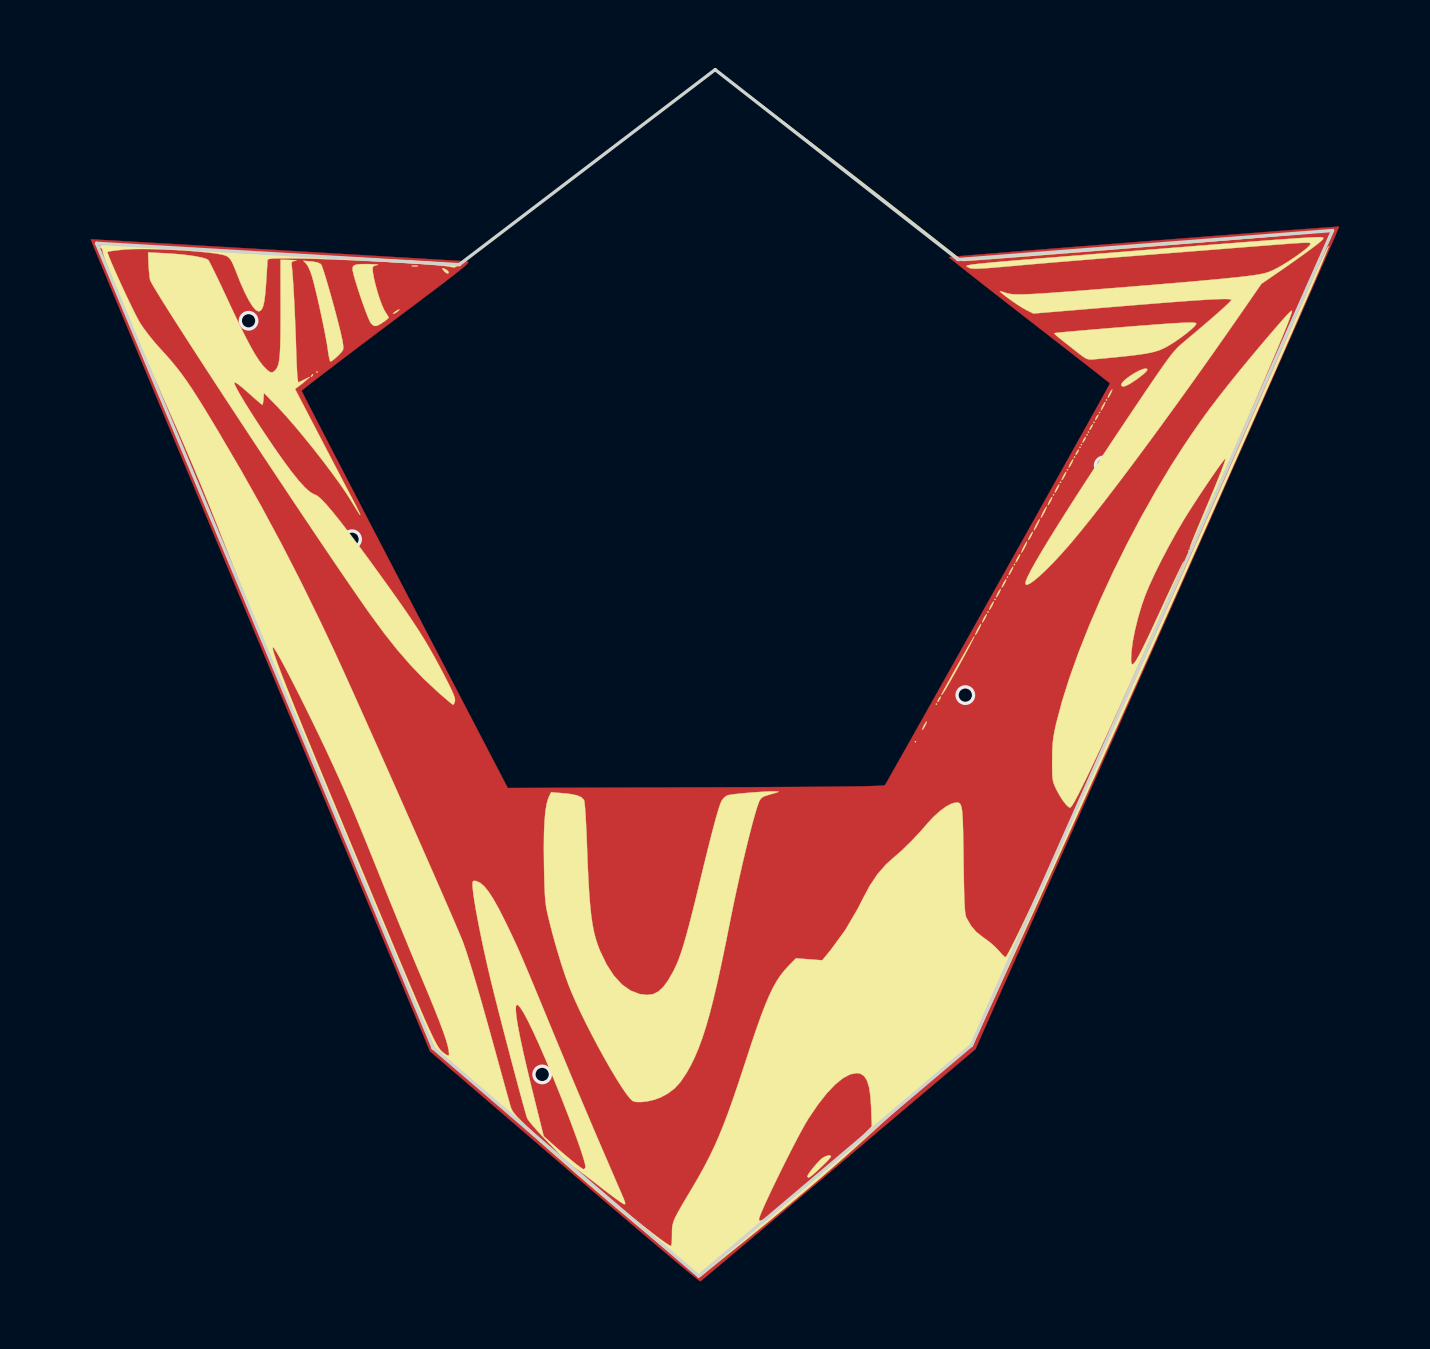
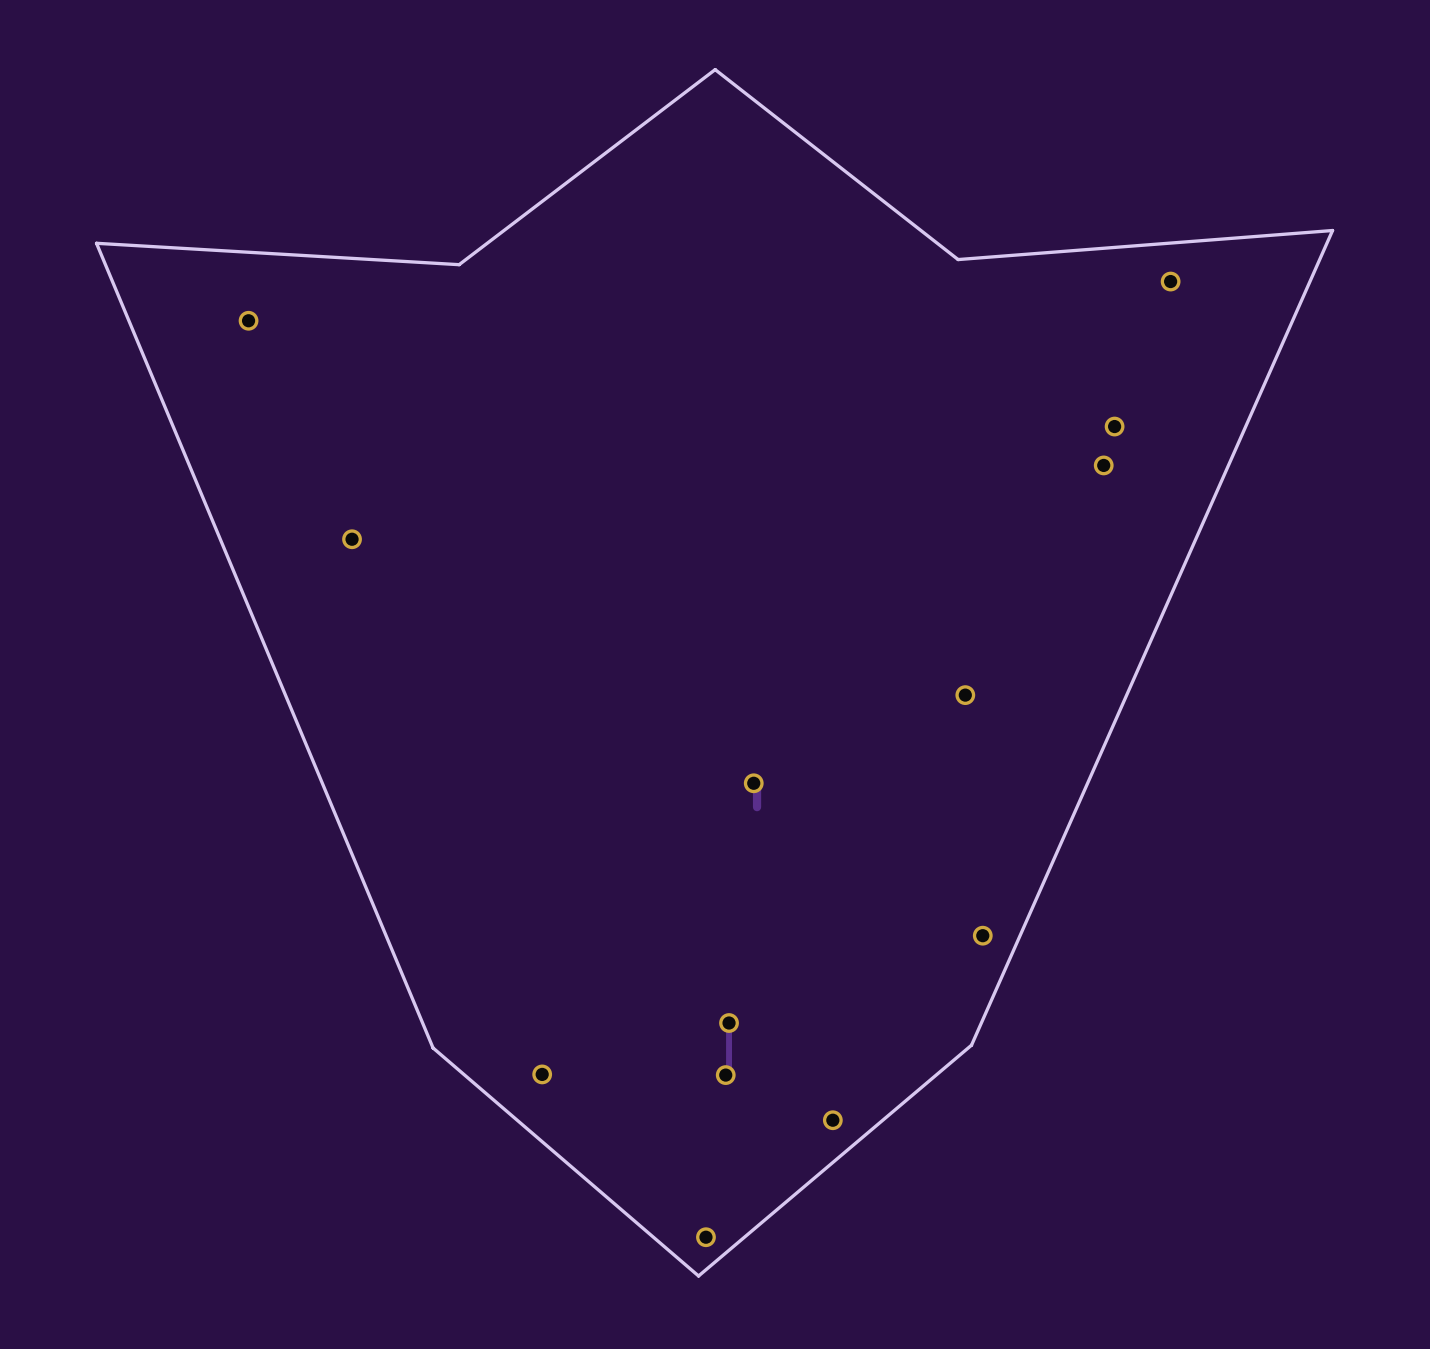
drawing: [90, 83, 1340, 1282] -> none
via: none -> (1170, 281)
via: none -> (1114, 426)
track: none -> (753, 783) (757, 786) (757, 807)
via: none -> (753, 783)
via: none -> (982, 935)
track: none -> (729, 1023) (729, 1071) (725, 1075)
via: none -> (729, 1023)
via: none -> (725, 1075)
via: none -> (832, 1120)
via: none -> (705, 1237)

